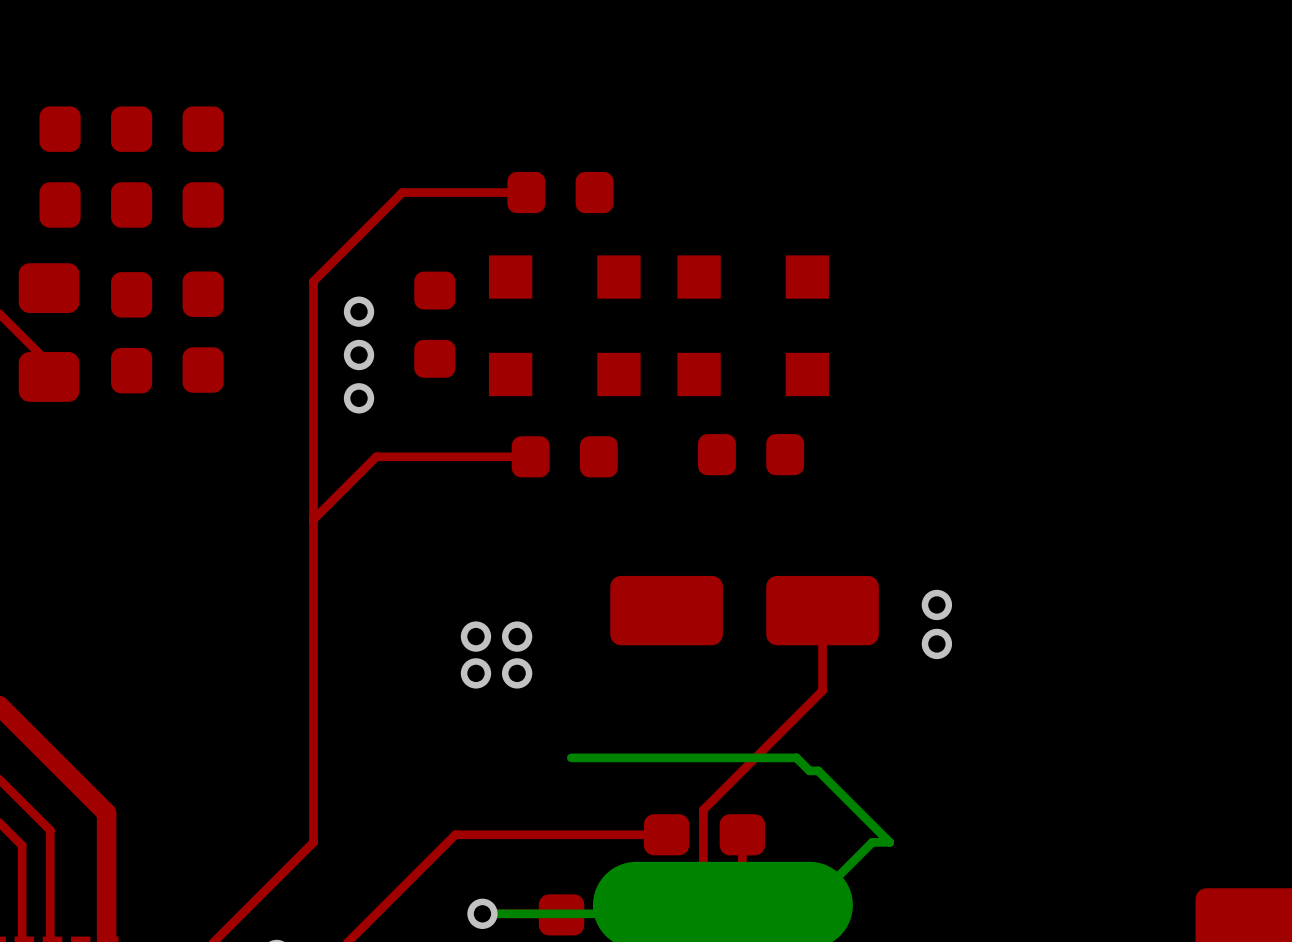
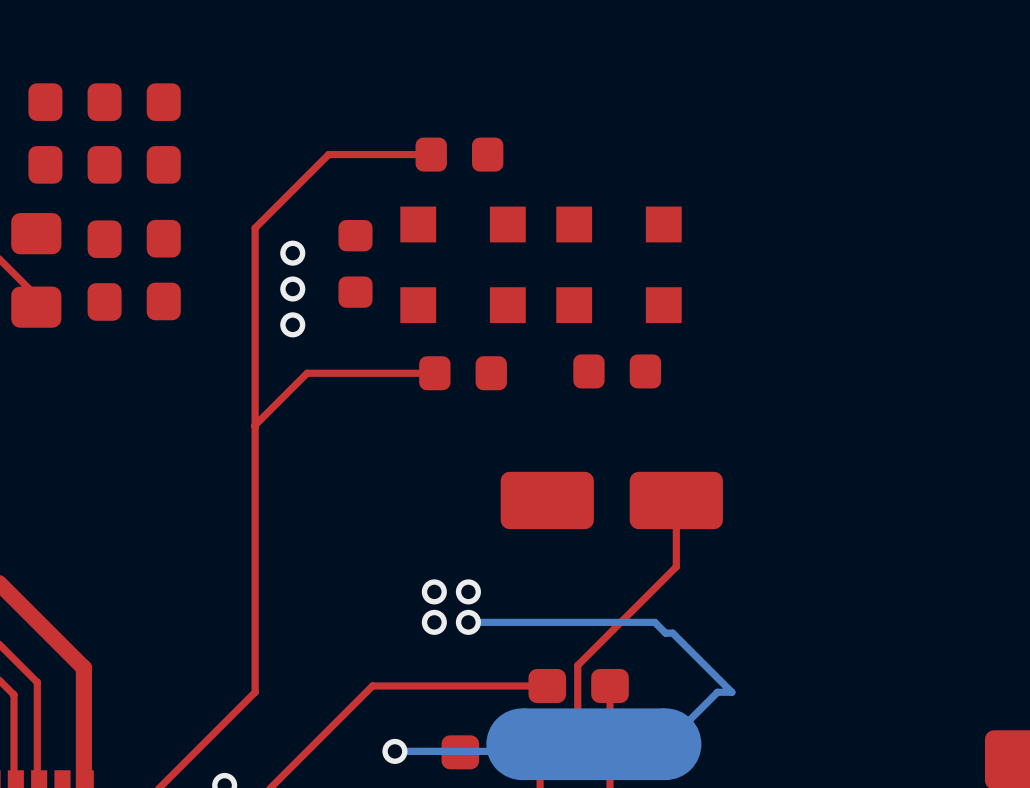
via: (936, 604) -> none
via: (475, 636) -> none
via: (517, 636) -> none
via: (936, 643) -> none
via: (475, 673) -> none
via: (517, 673) -> none
via: none -> (434, 591)
via: none -> (468, 591)
via: none -> (434, 622)
via: none -> (468, 622)

